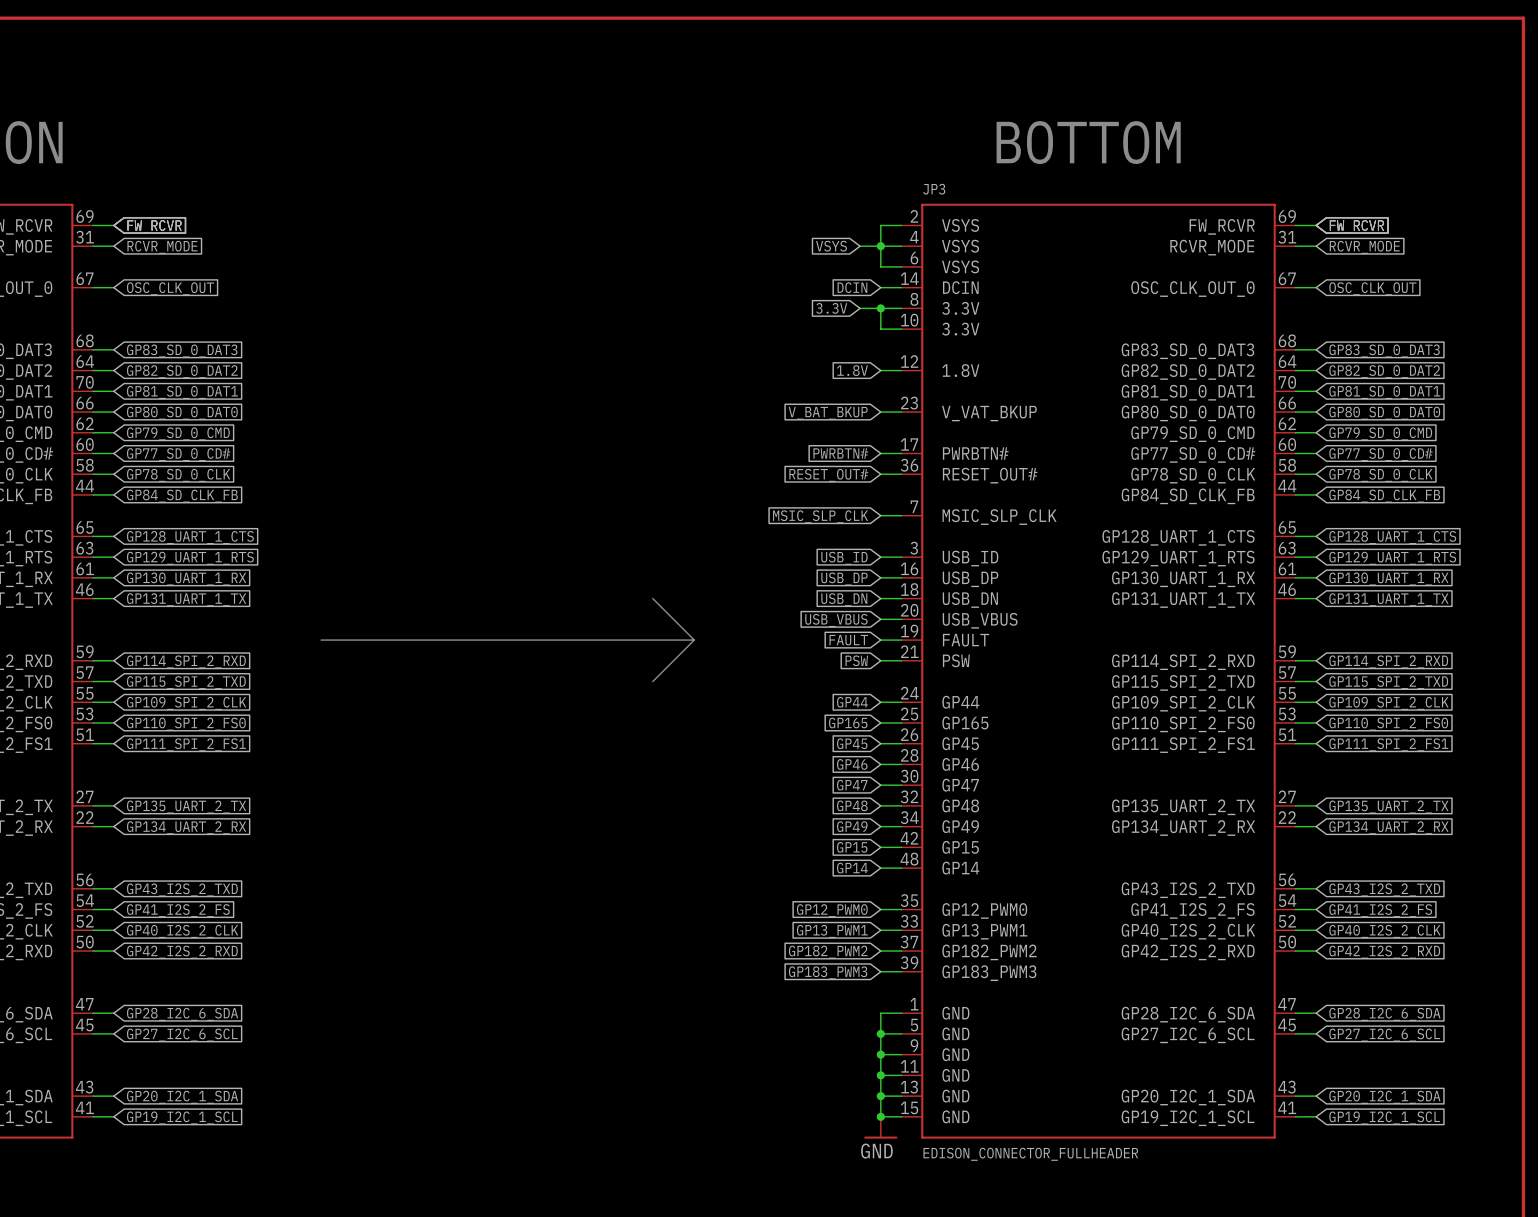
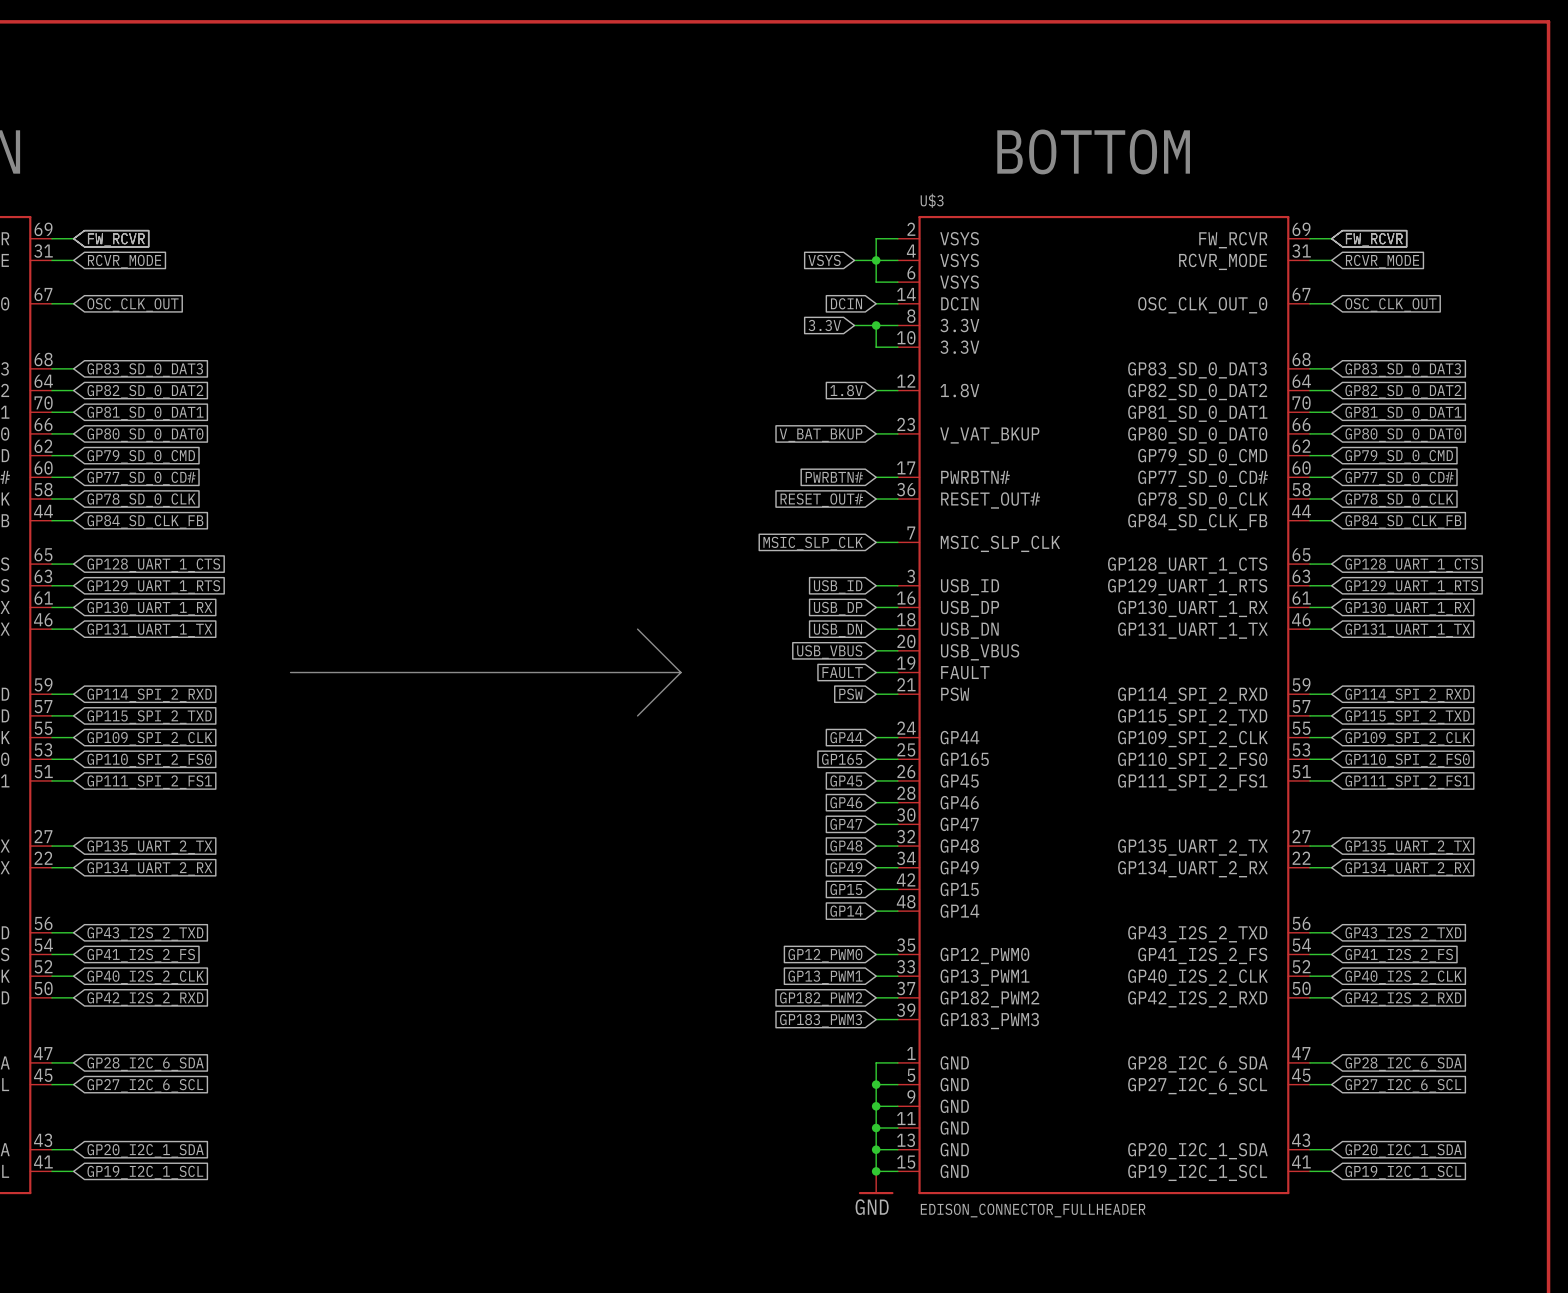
JP3 name: JP3 (934, 189) -> U$3 (932, 200)

